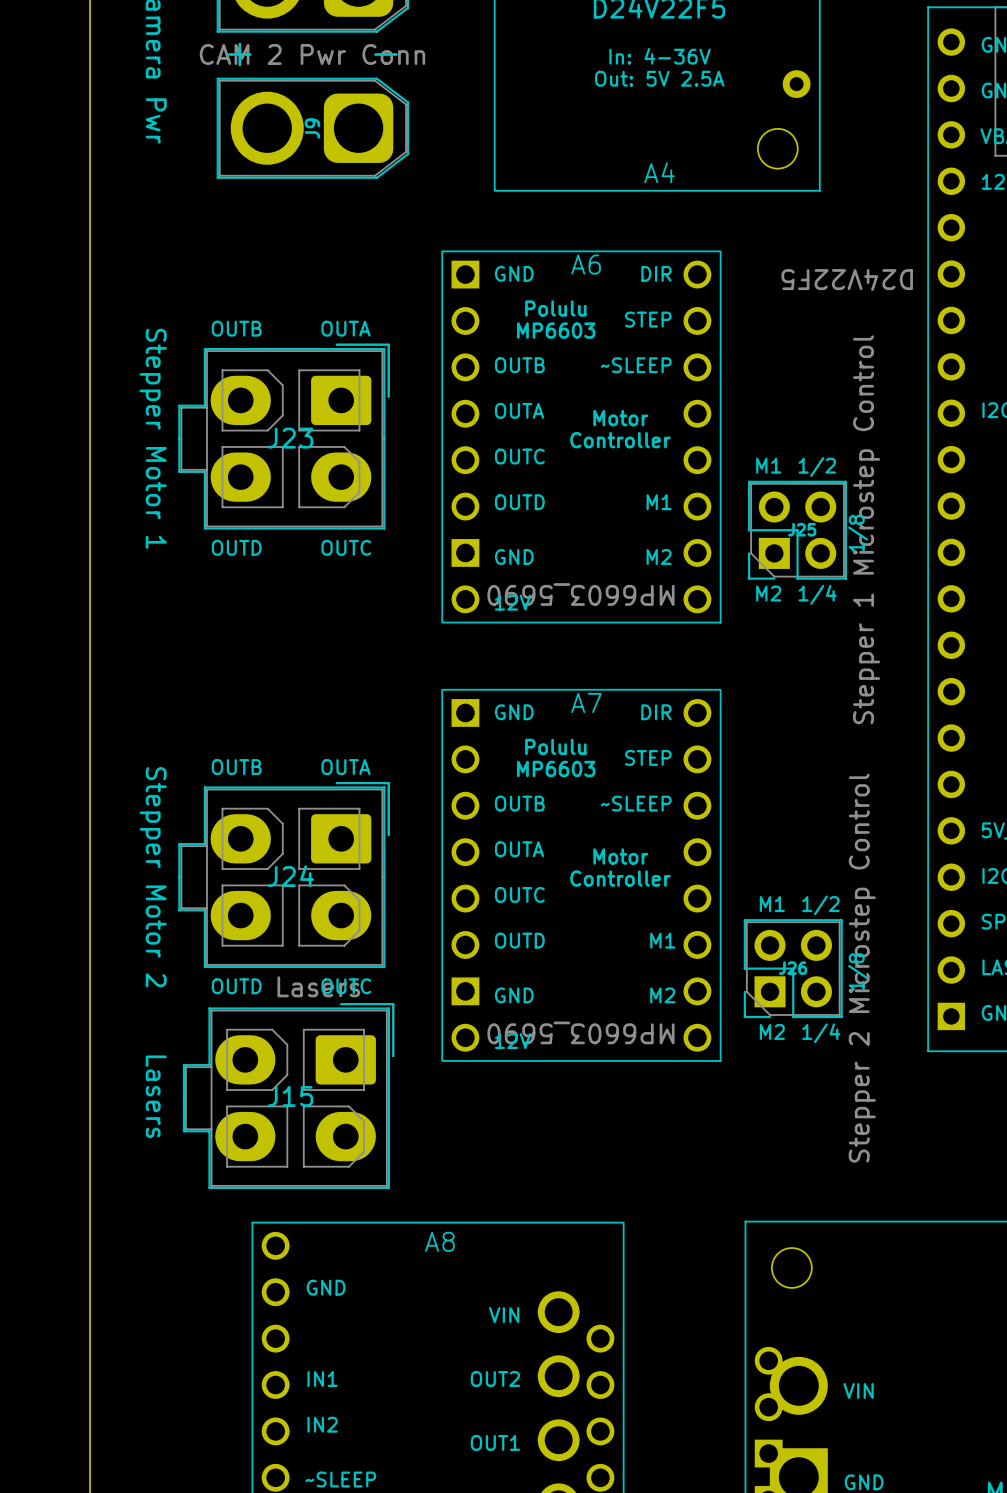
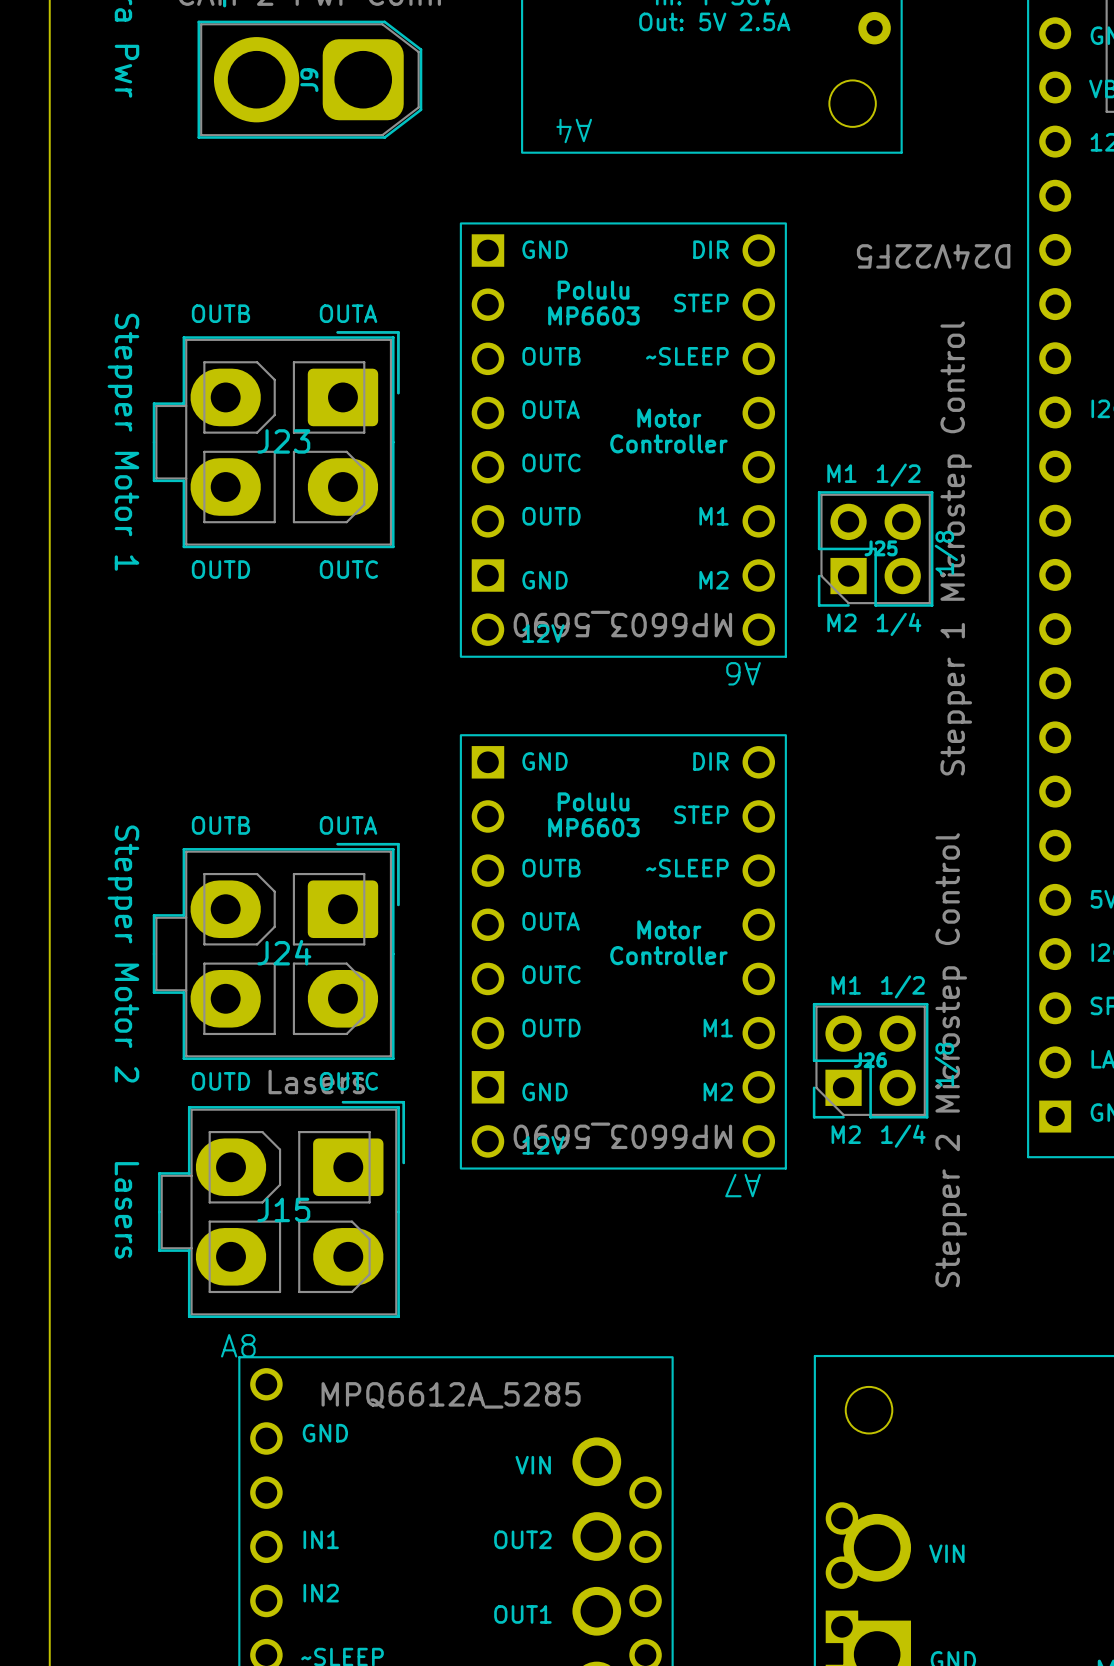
A4 name rotation: 0° (659, 172) -> 180° (574, 130)
A4 name position: A4 (659, 172) -> A4 (574, 130)
A6 name rotation: 0° (586, 264) -> 180° (743, 673)
A6 name position: A6 (586, 264) -> A6 (743, 673)
A7 name rotation: 0° (586, 702) -> 180° (743, 1185)
A7 name position: A7 (586, 702) -> A7 (743, 1185)
A8 name position: A8 (439, 1241) -> A8 (238, 1345)
A8 value: none -> MPQ6612A_5285 (451, 1395)

